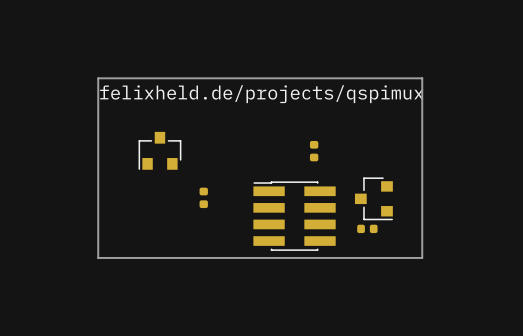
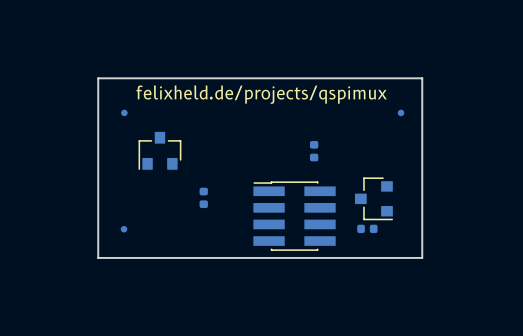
part: none -> (124, 112)
part: none -> (401, 112)
part: none -> (124, 229)

